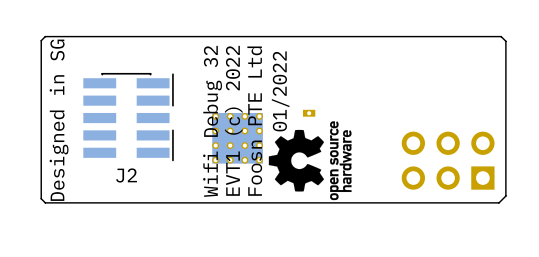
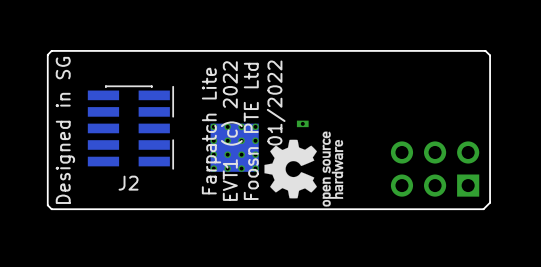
text: Wifi Debug 32 (212, 121) -> Farpatch Lite (211, 131)

